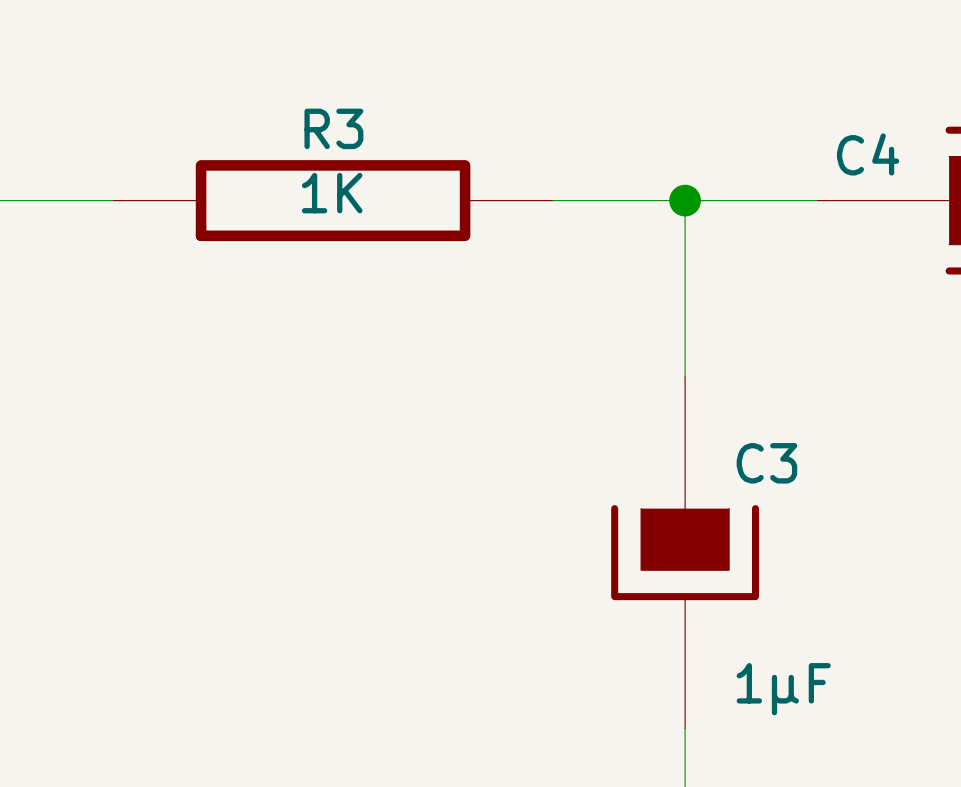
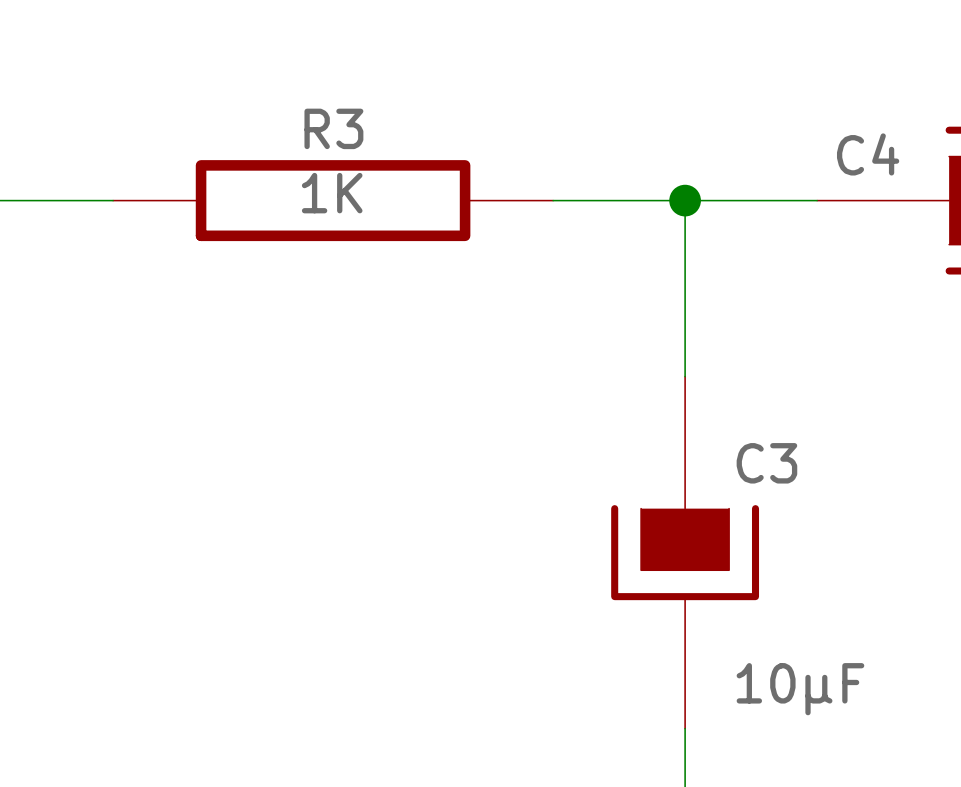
C3 value: 1µF (783, 689) -> 10µF (800, 689)

